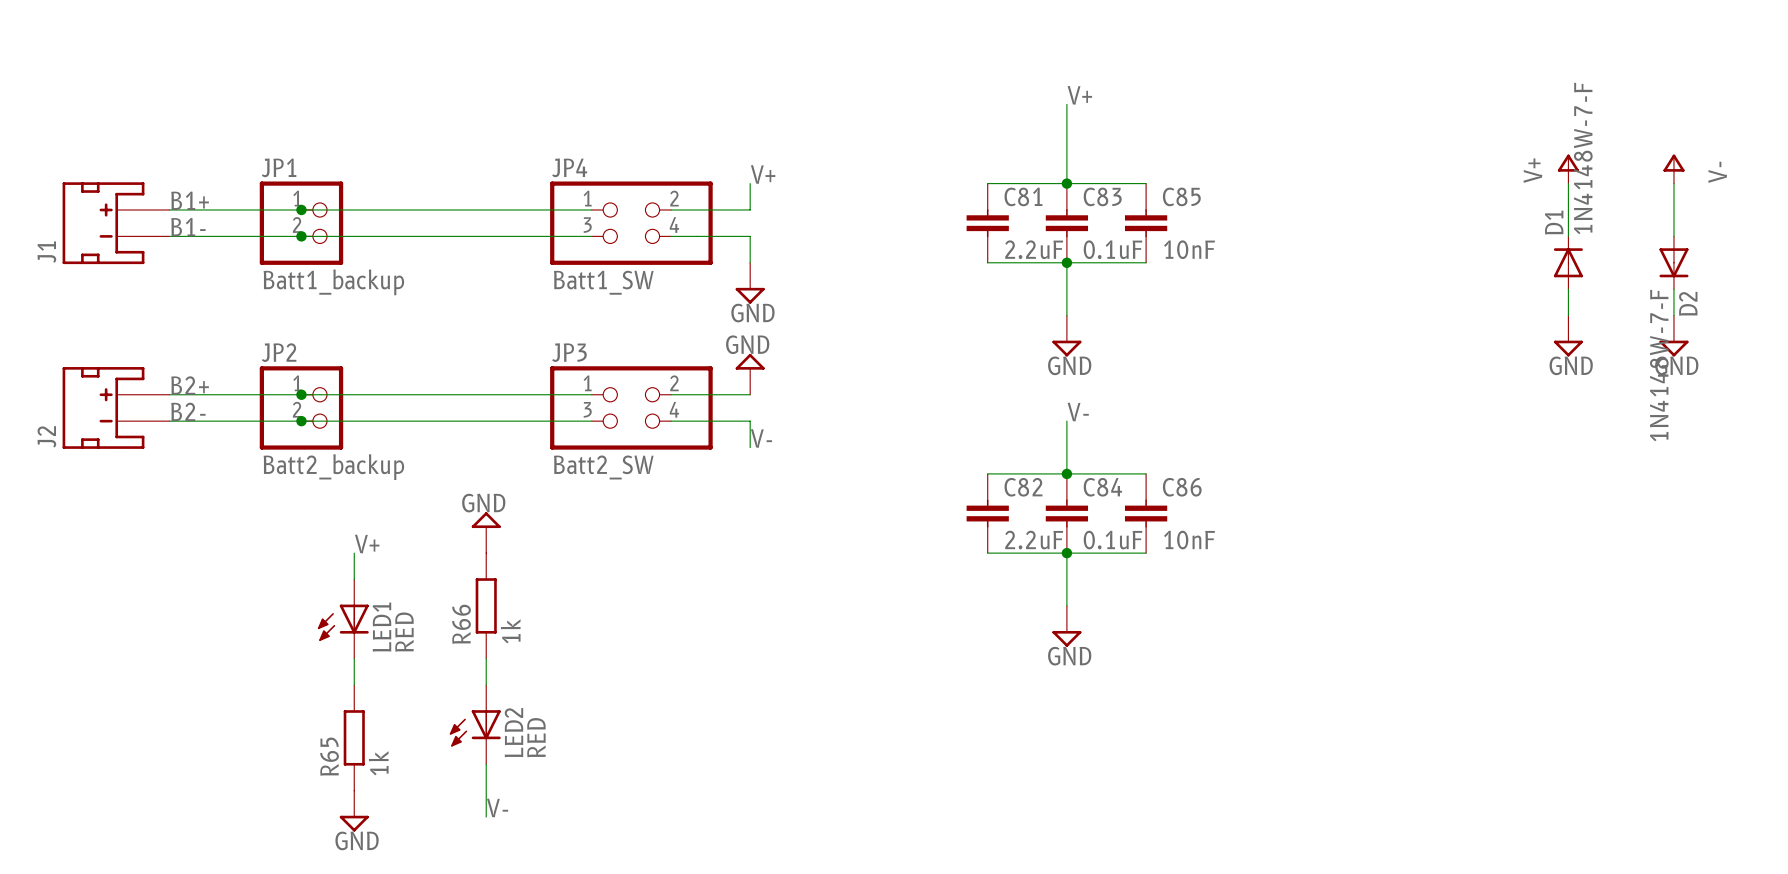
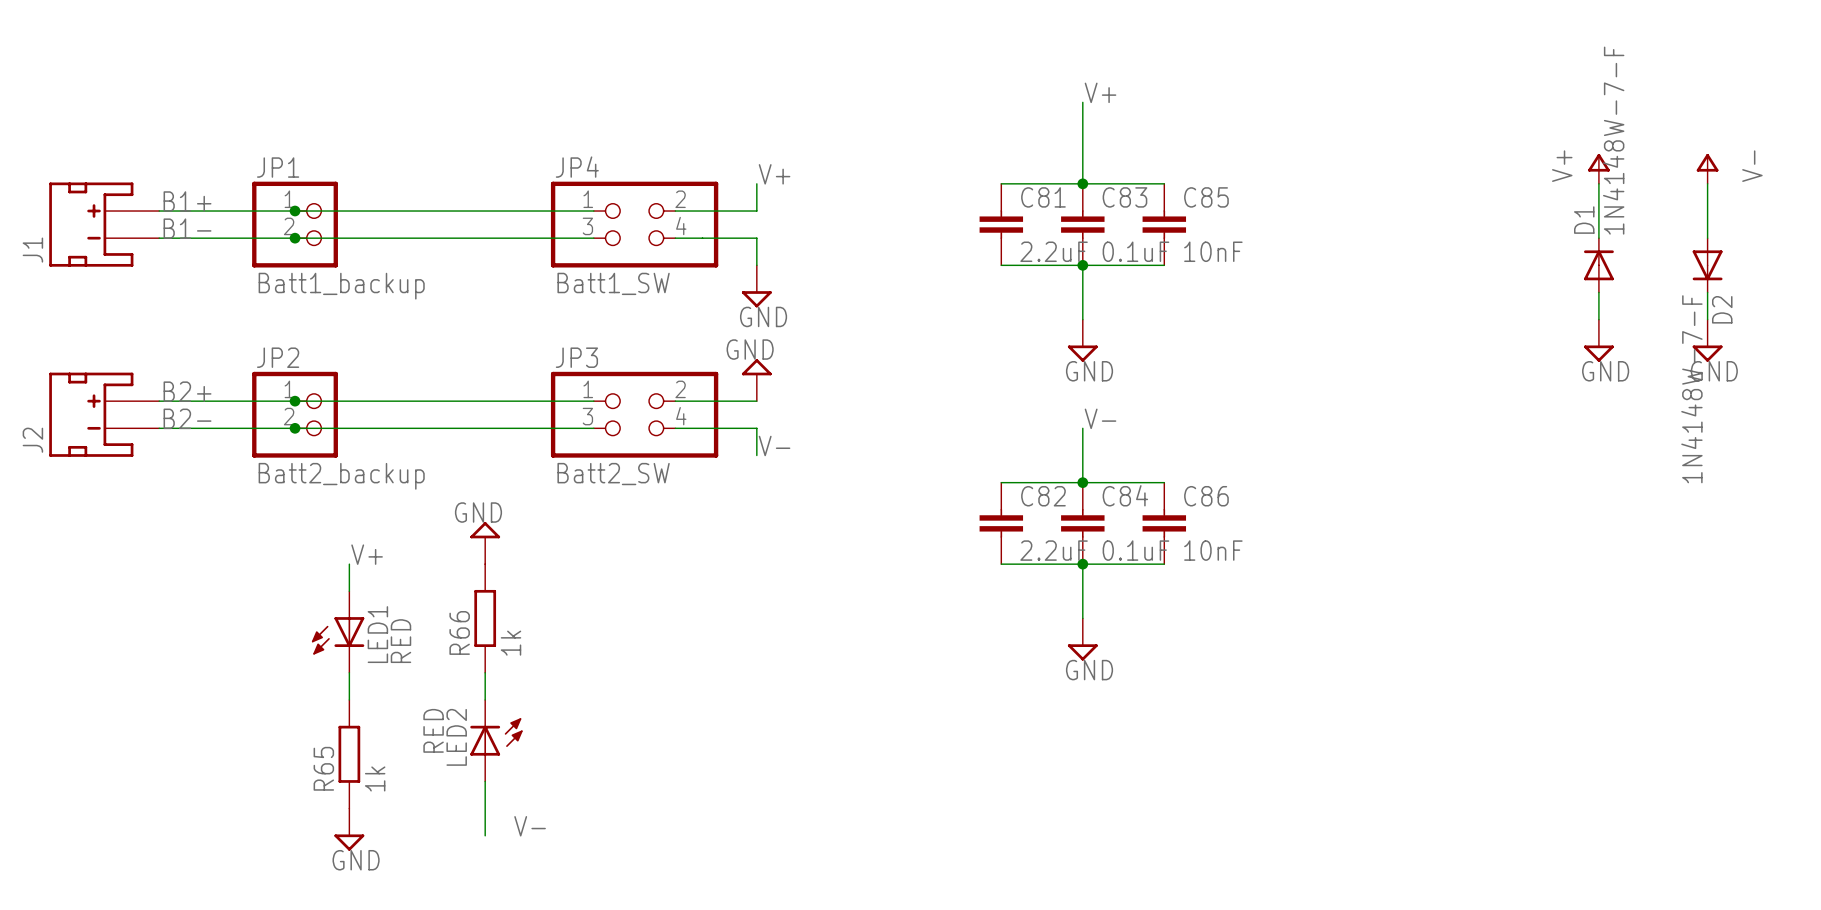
LED2 rotation: 0° (475, 728) -> 180° (496, 736)
label position: V- (497, 807) -> V- (530, 826)

